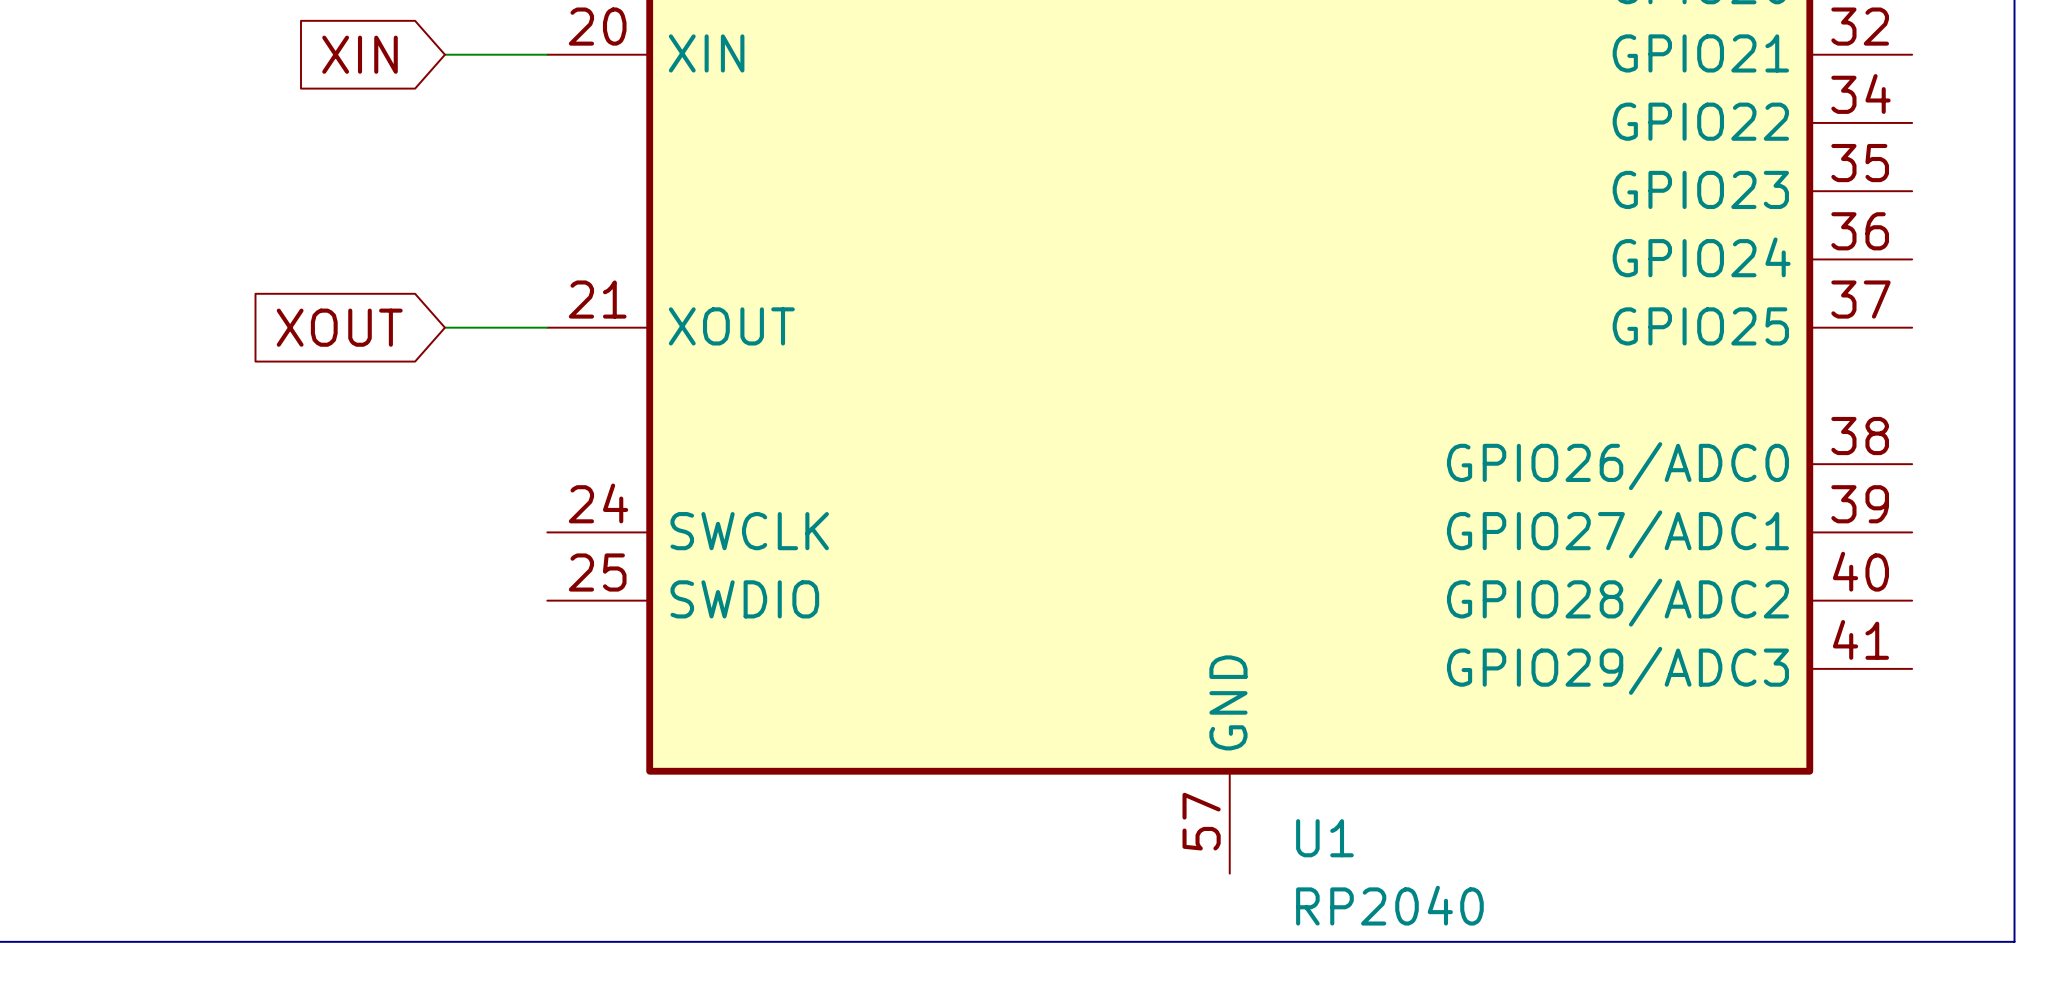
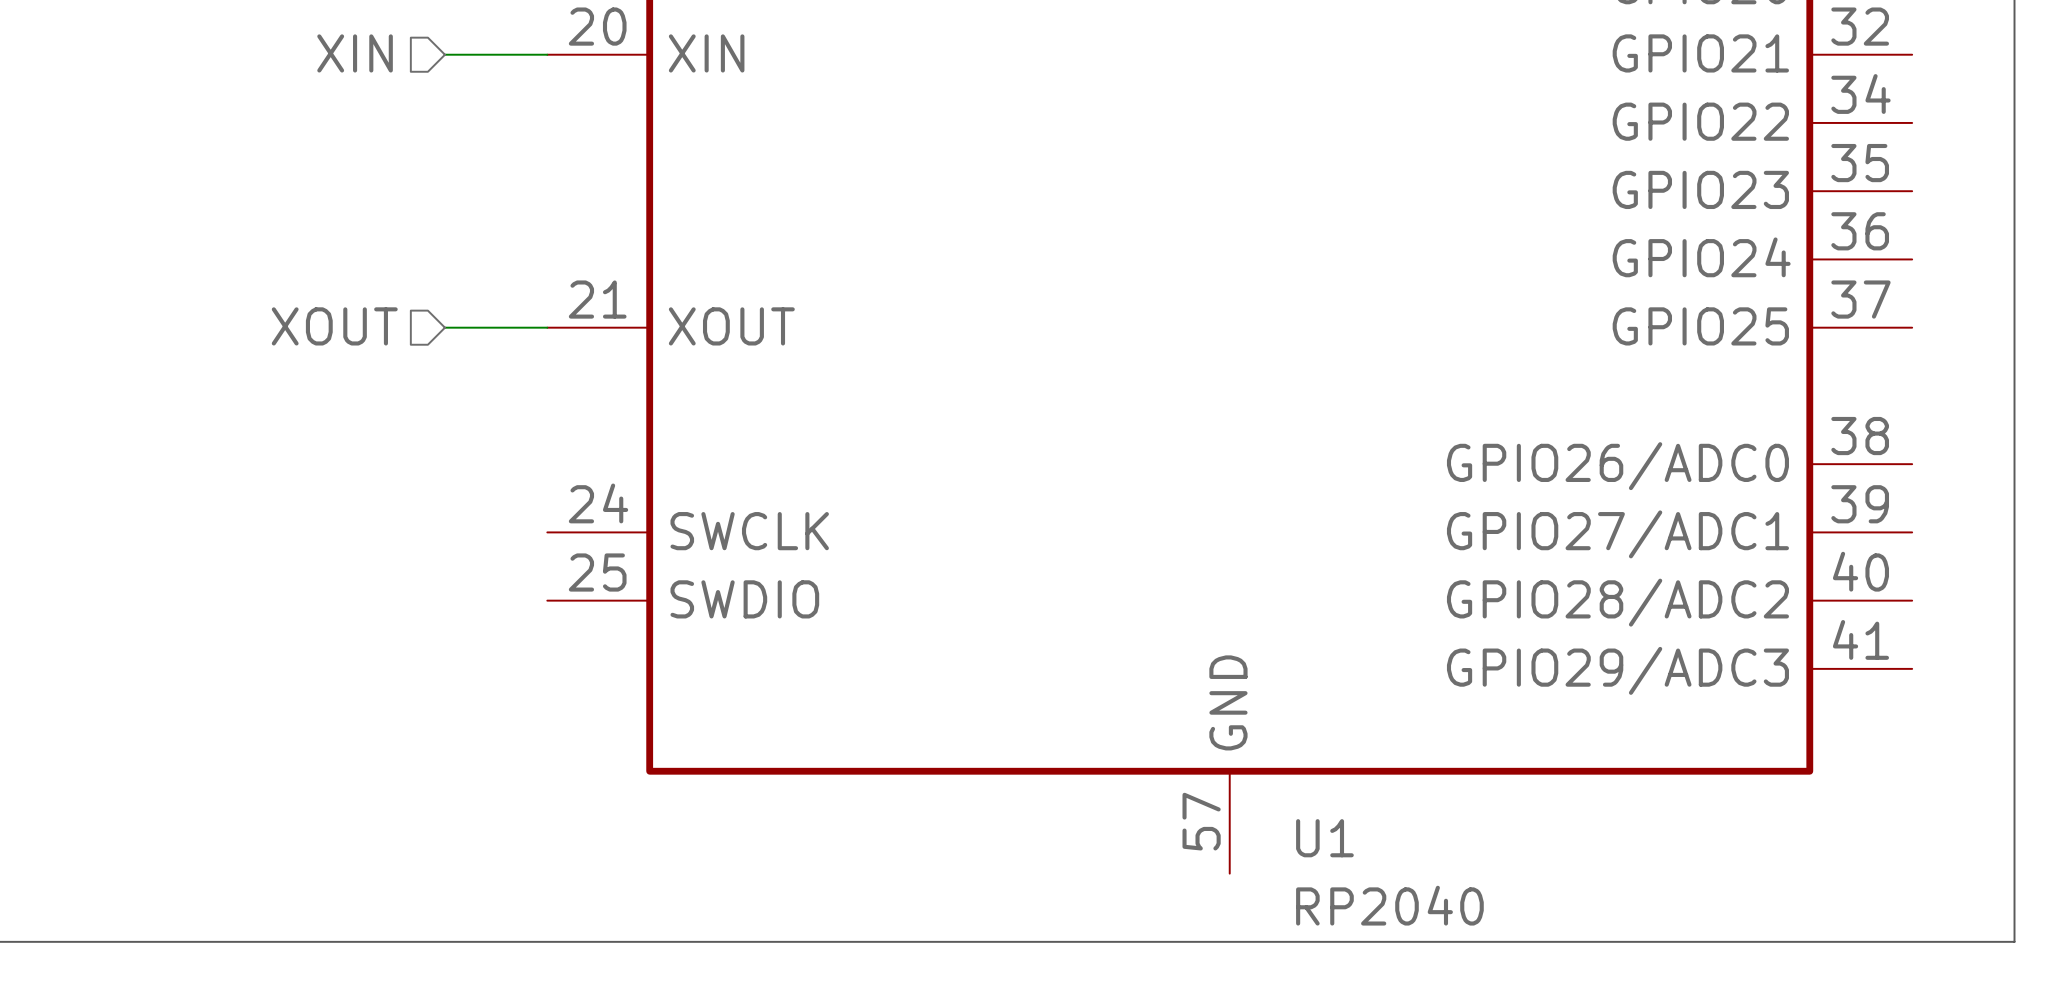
hierarchical label: none -> XIN (355, 53)
global label: XIN (360, 54) -> none
hierarchical label: none -> XOUT (334, 326)
global label: XOUT (339, 327) -> none

